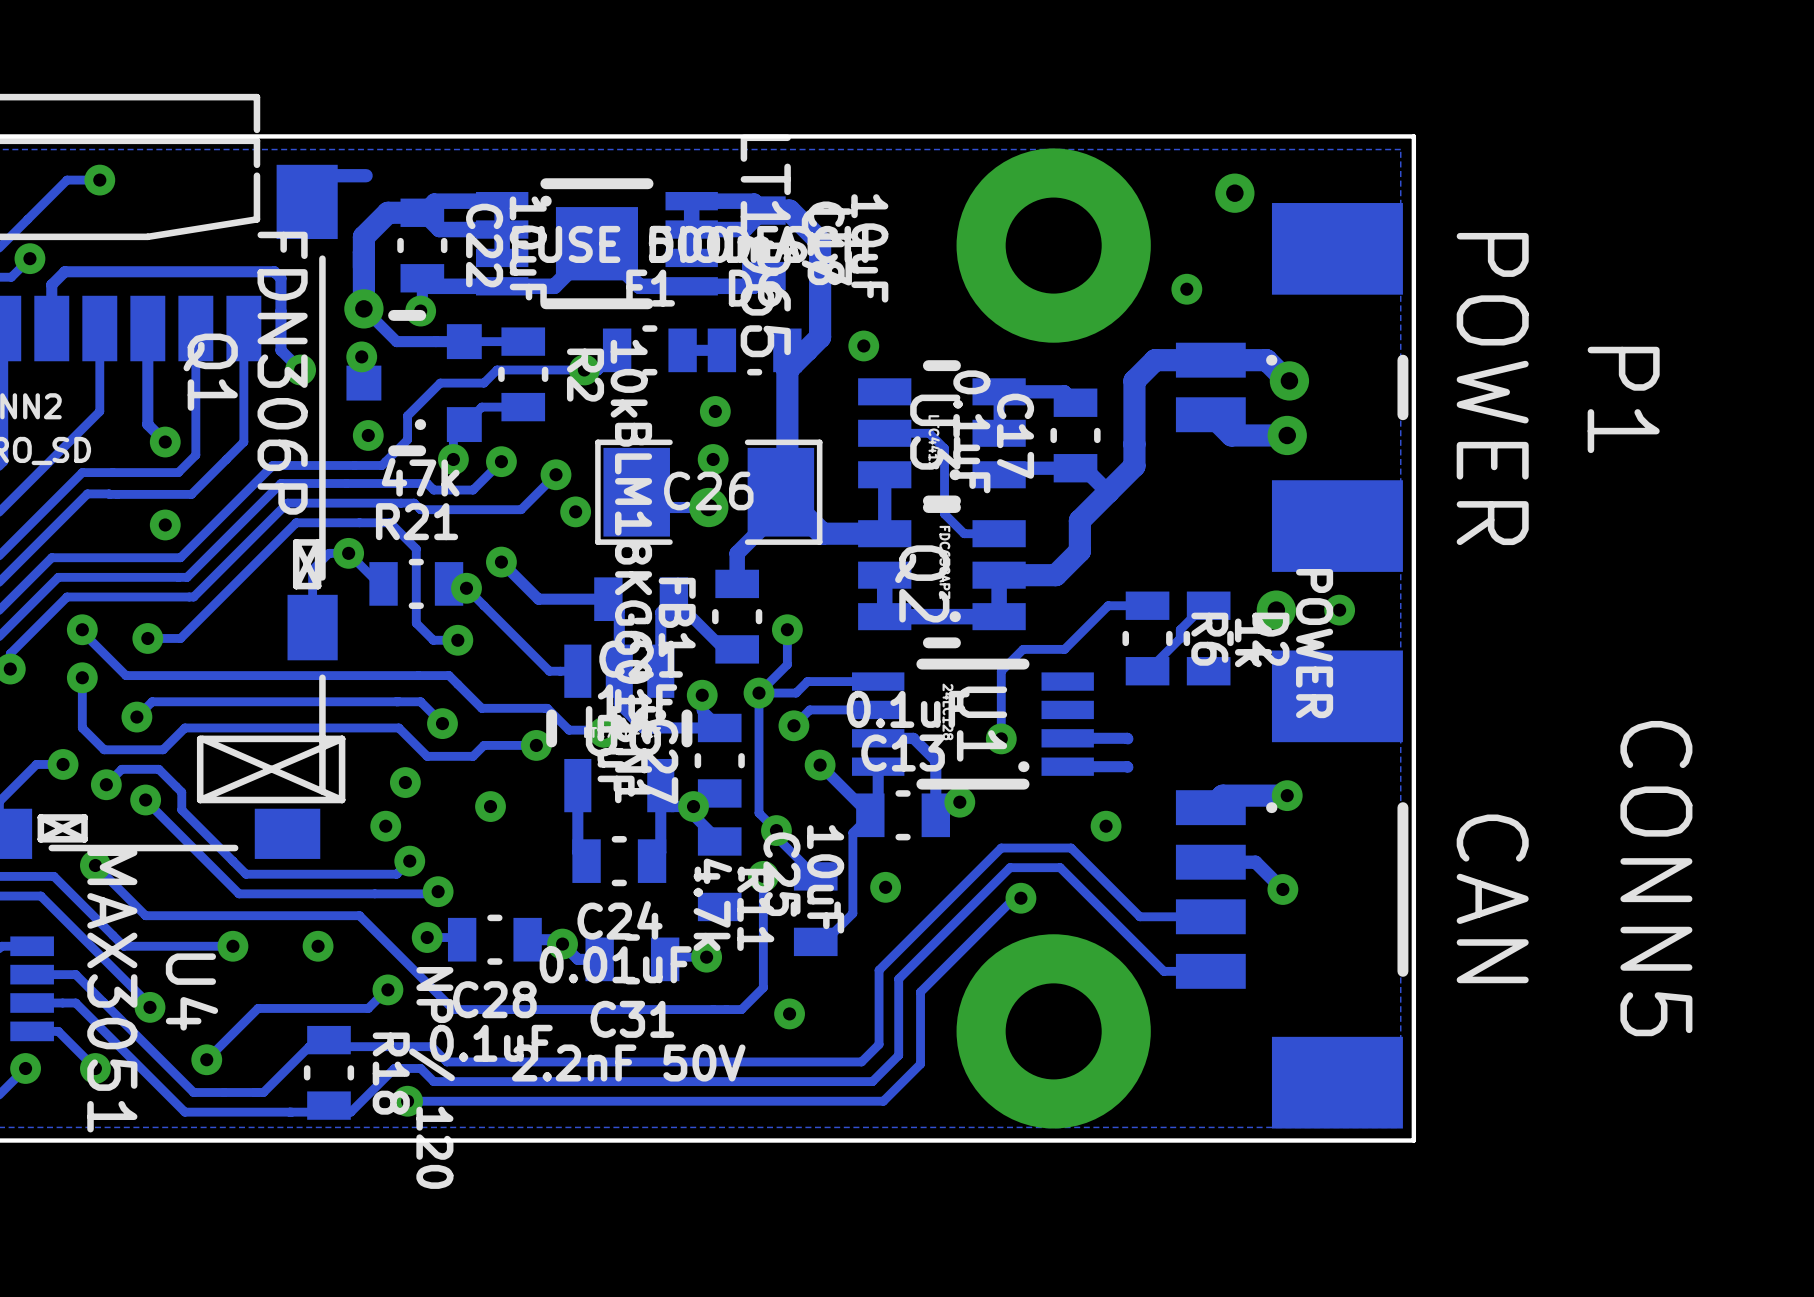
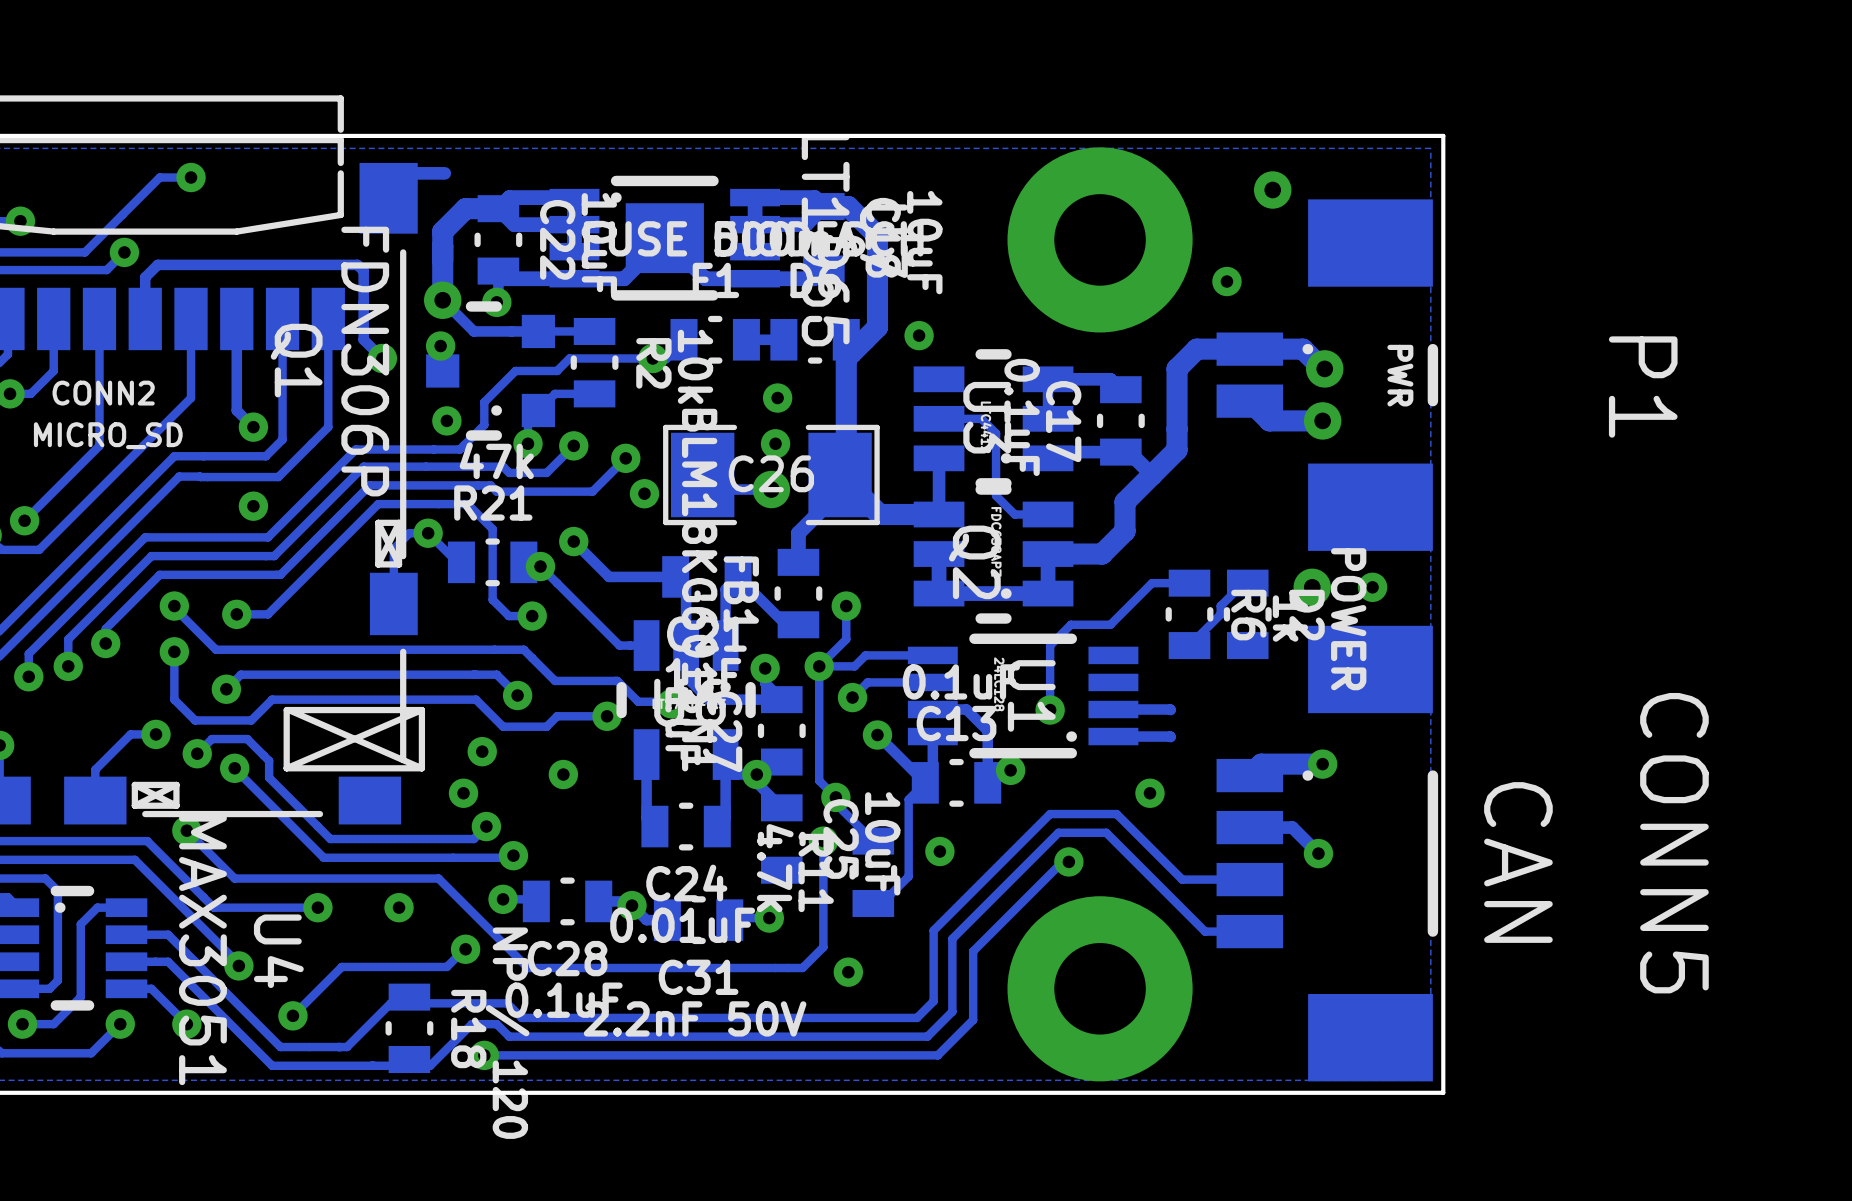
P1 value: POWER (1492, 389) -> PWR (1400, 375)

